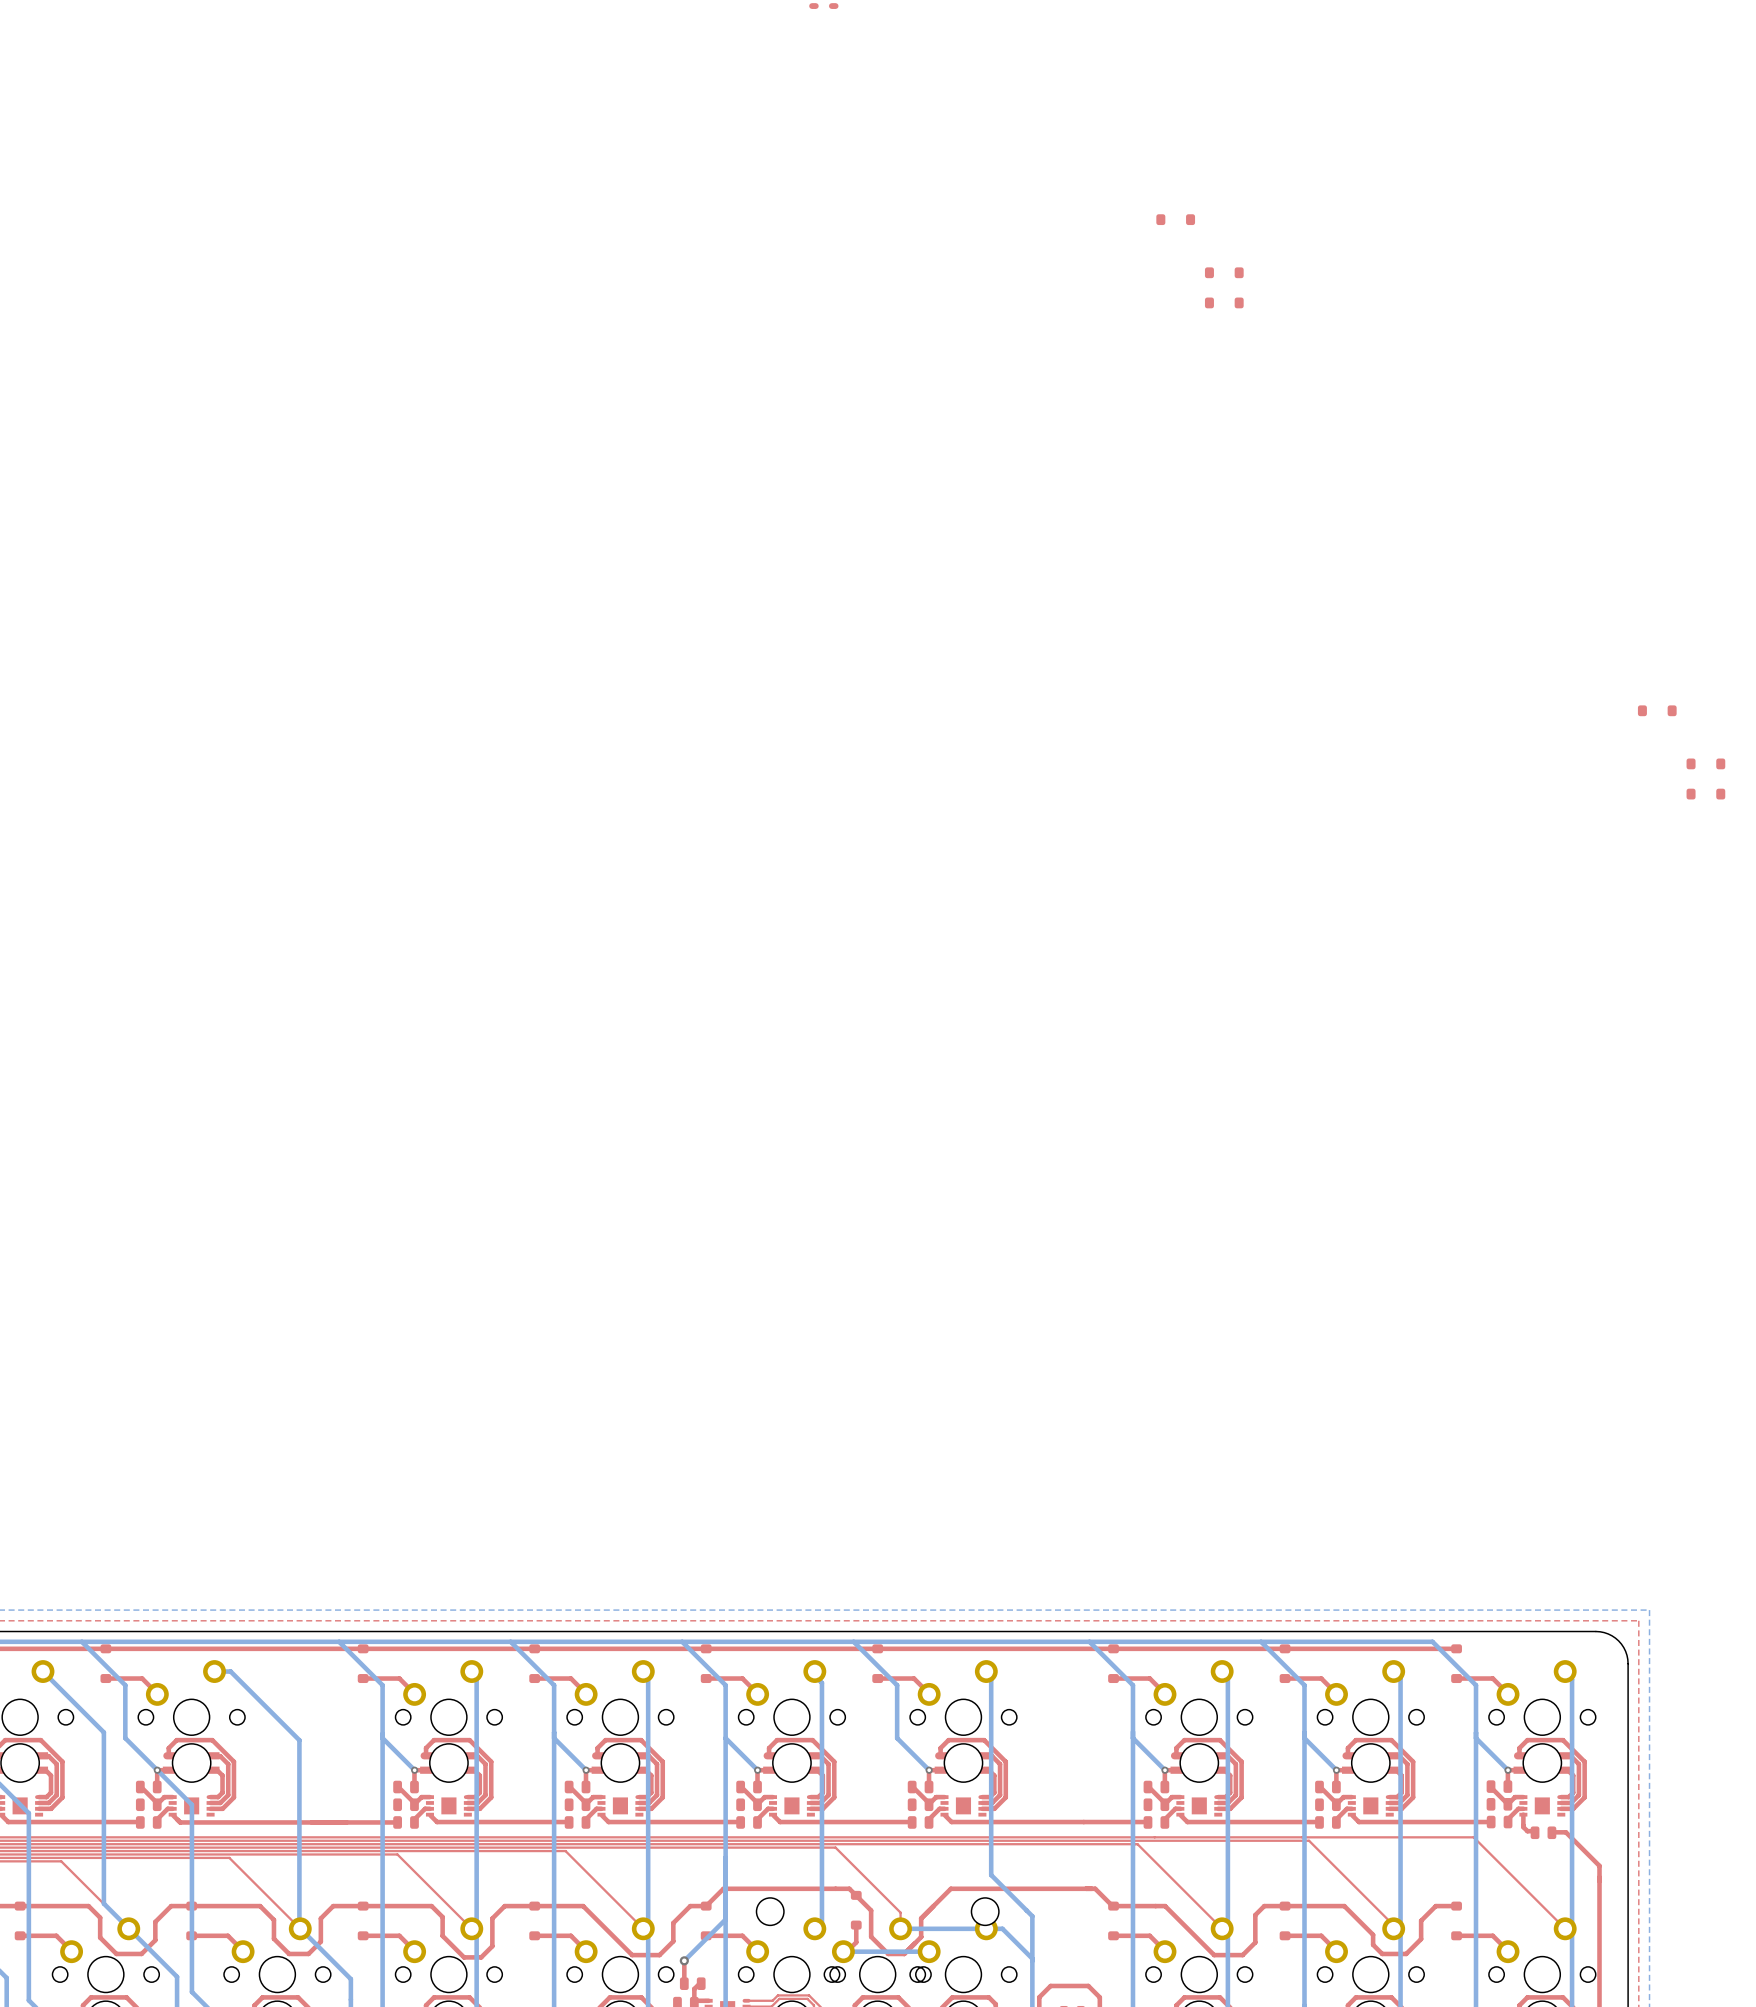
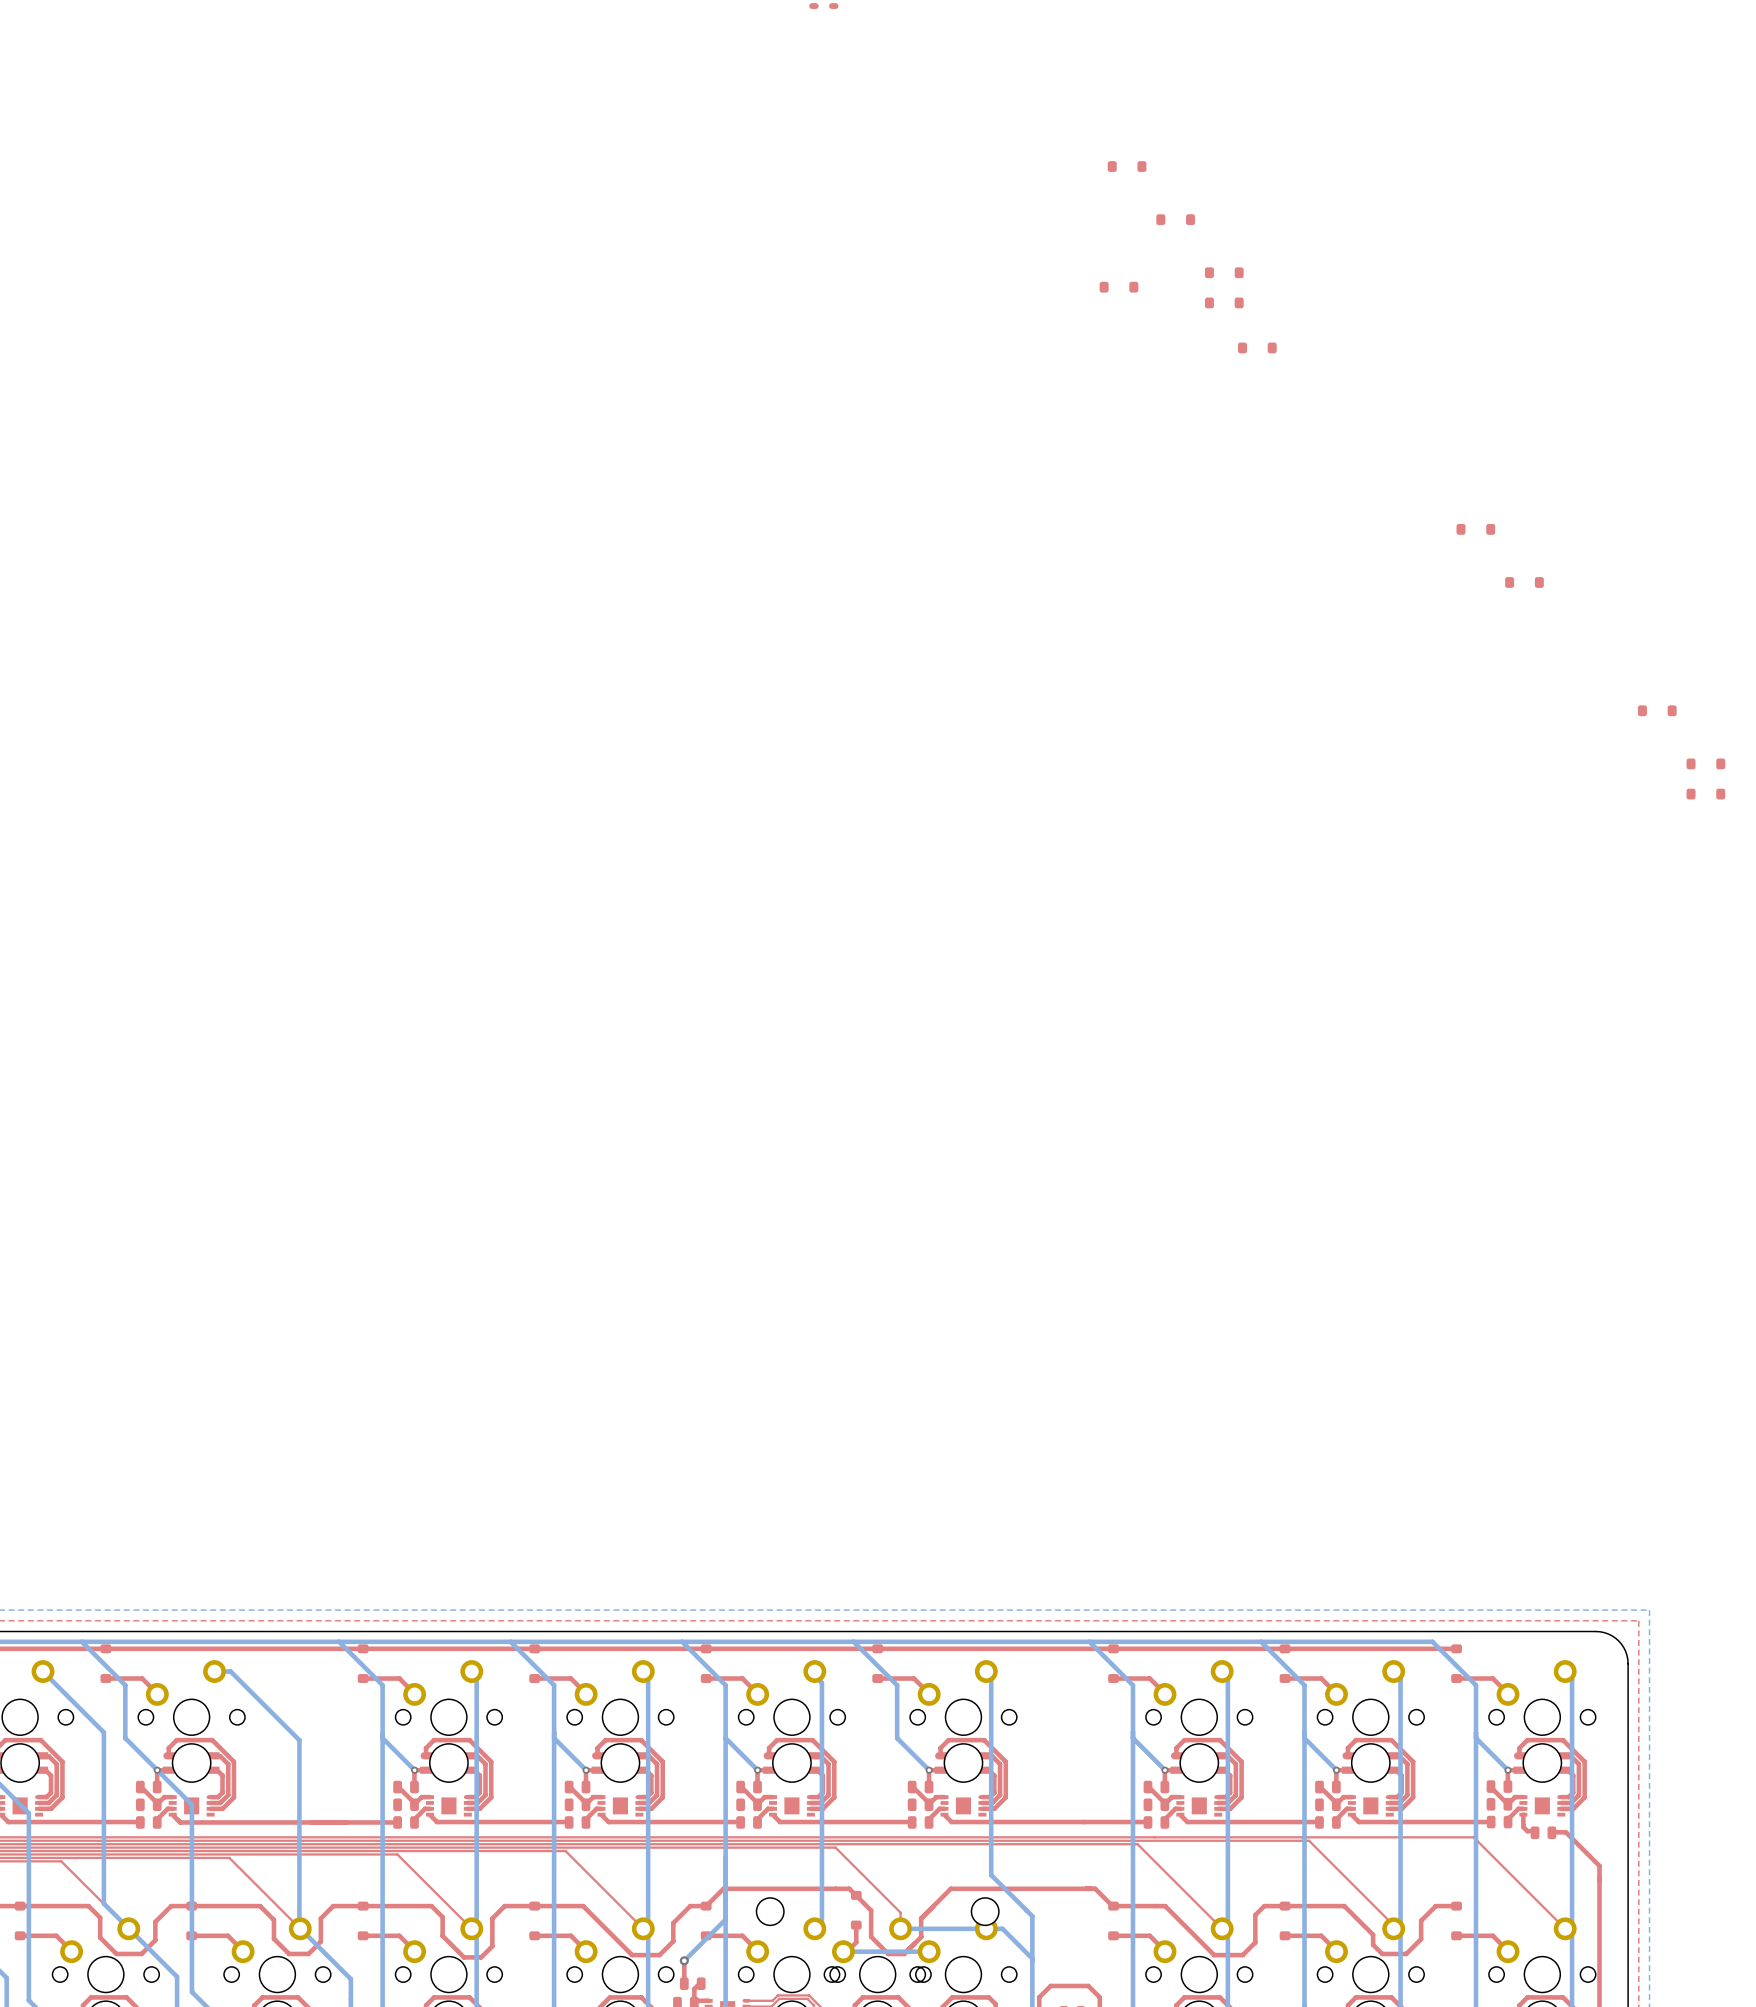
part: none -> (1127, 166)
part: none -> (1118, 287)
part: none -> (1257, 347)
part: none -> (1475, 529)
part: none -> (1524, 582)

